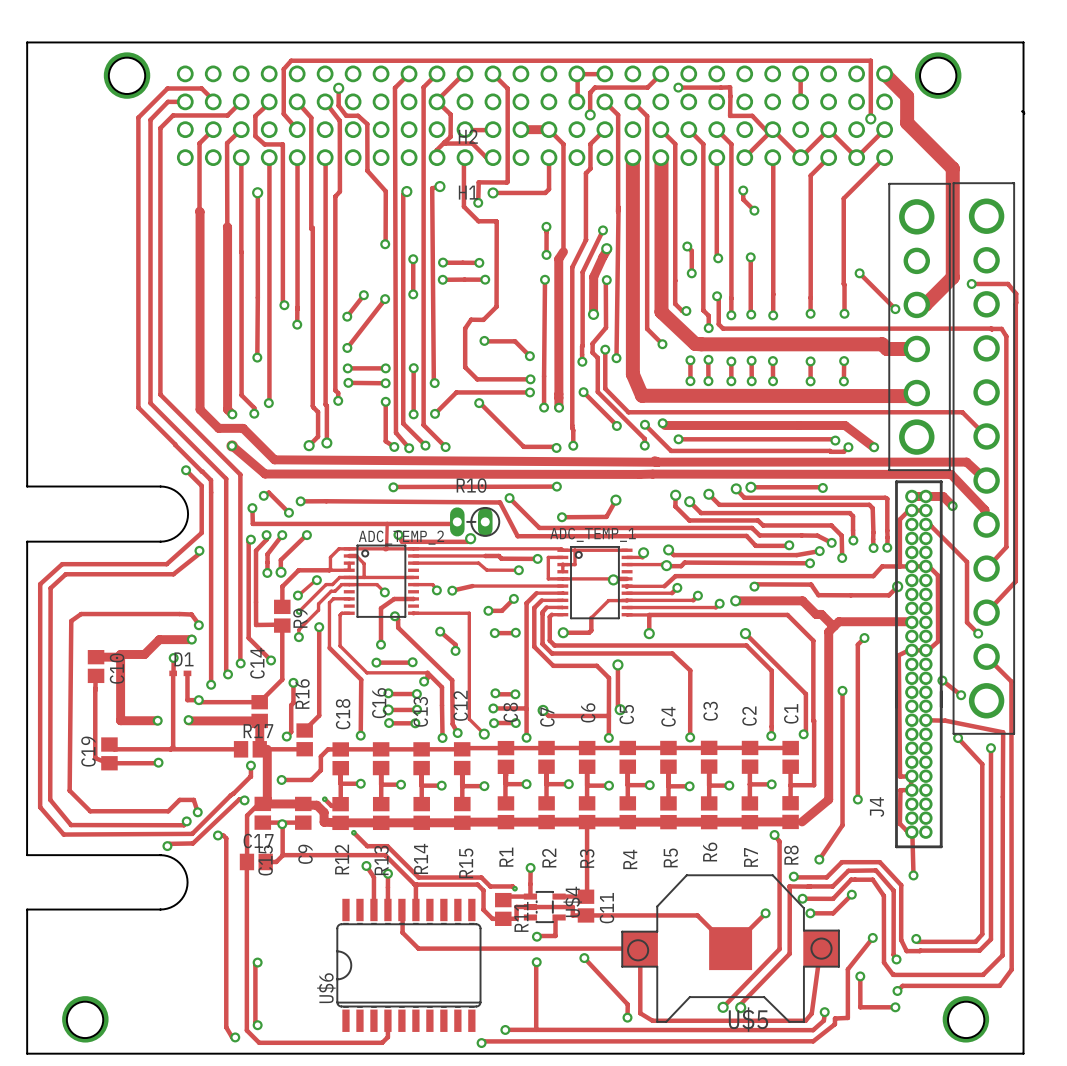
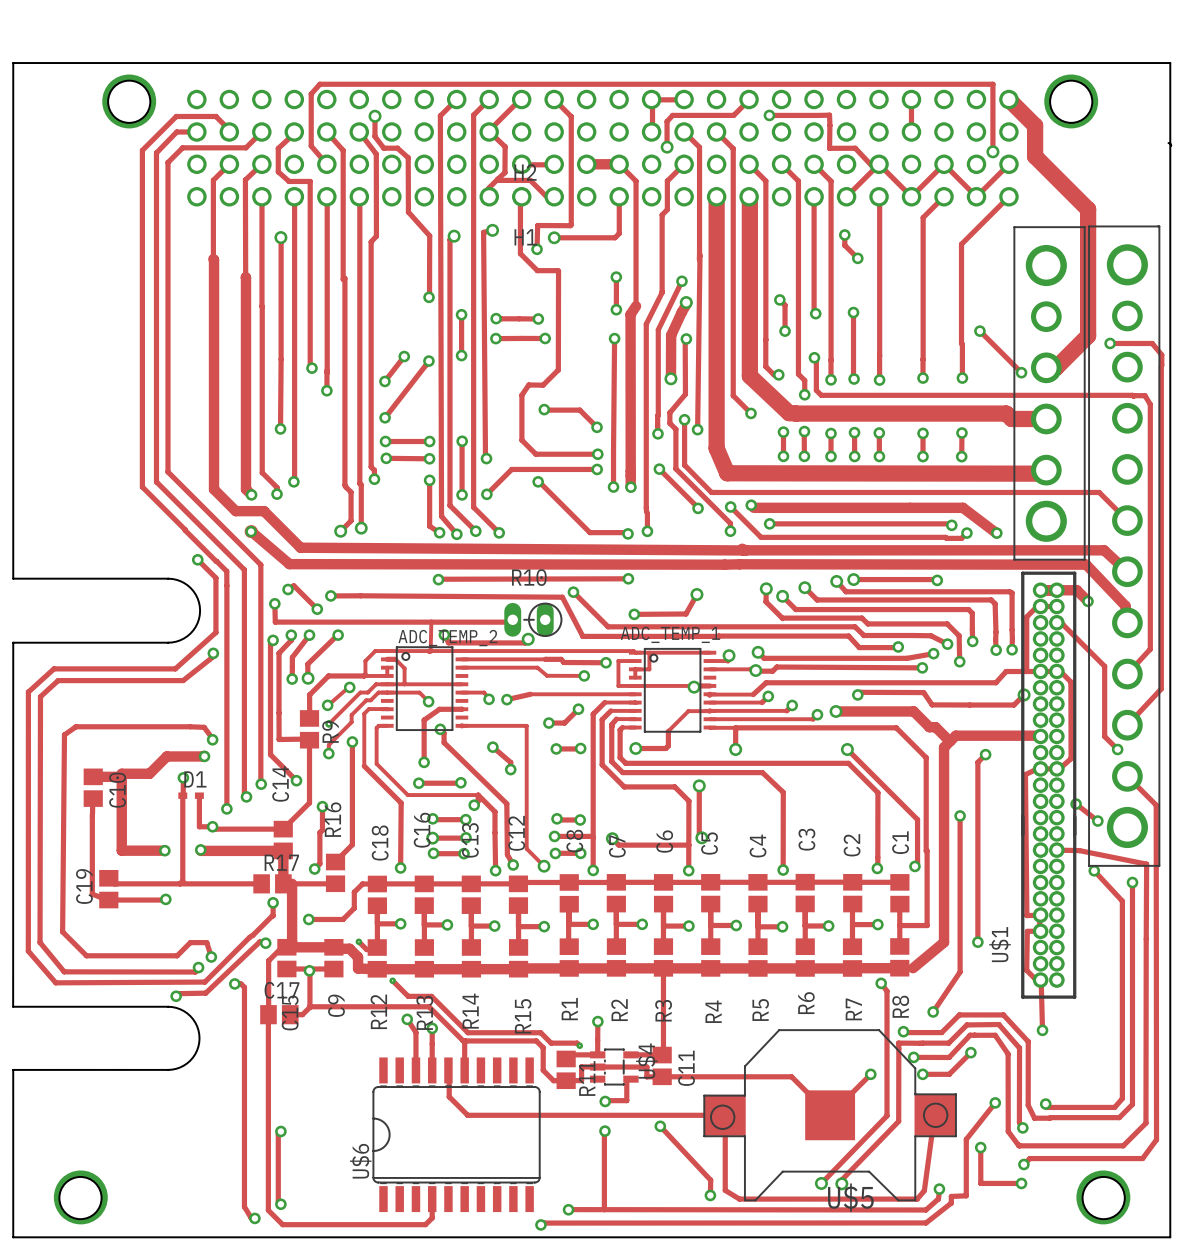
J4 name: J4 (877, 807) -> U$1 (1000, 944)

